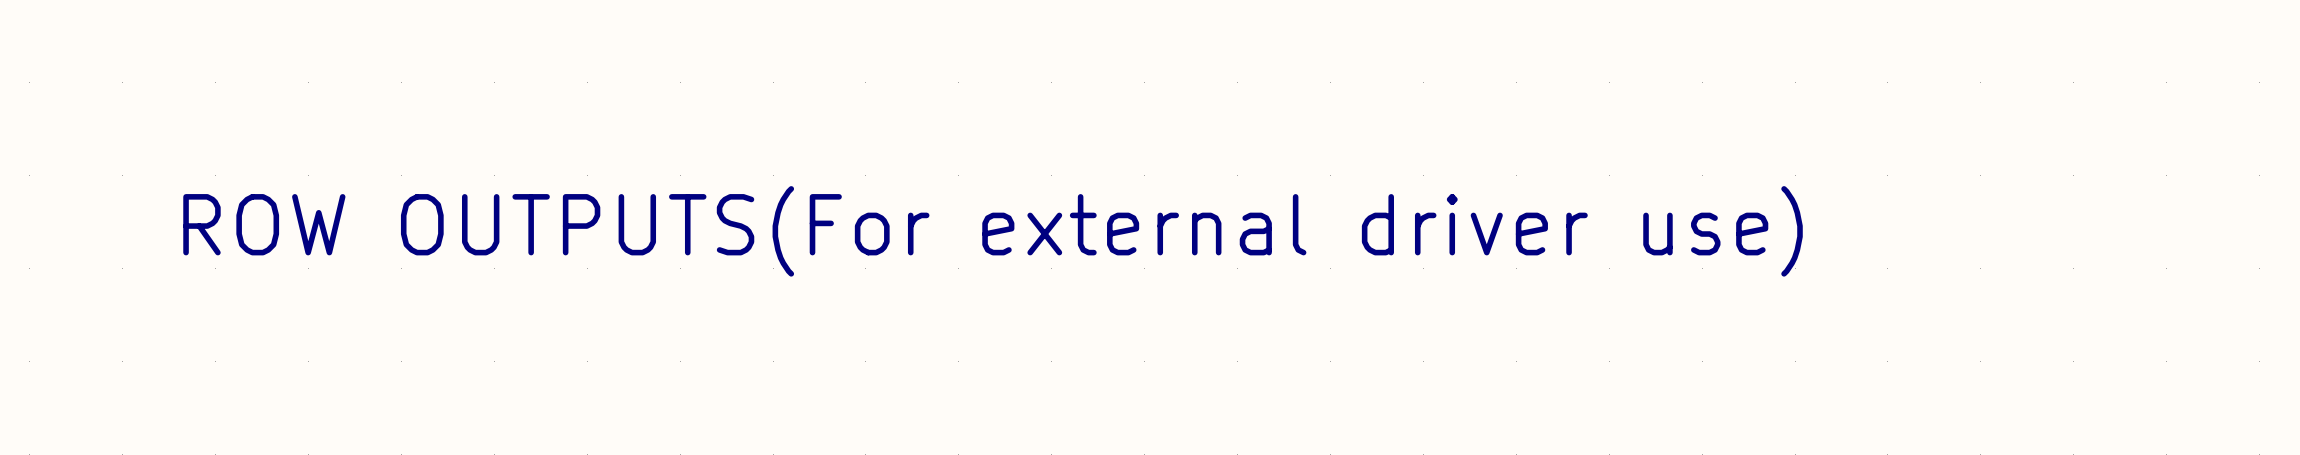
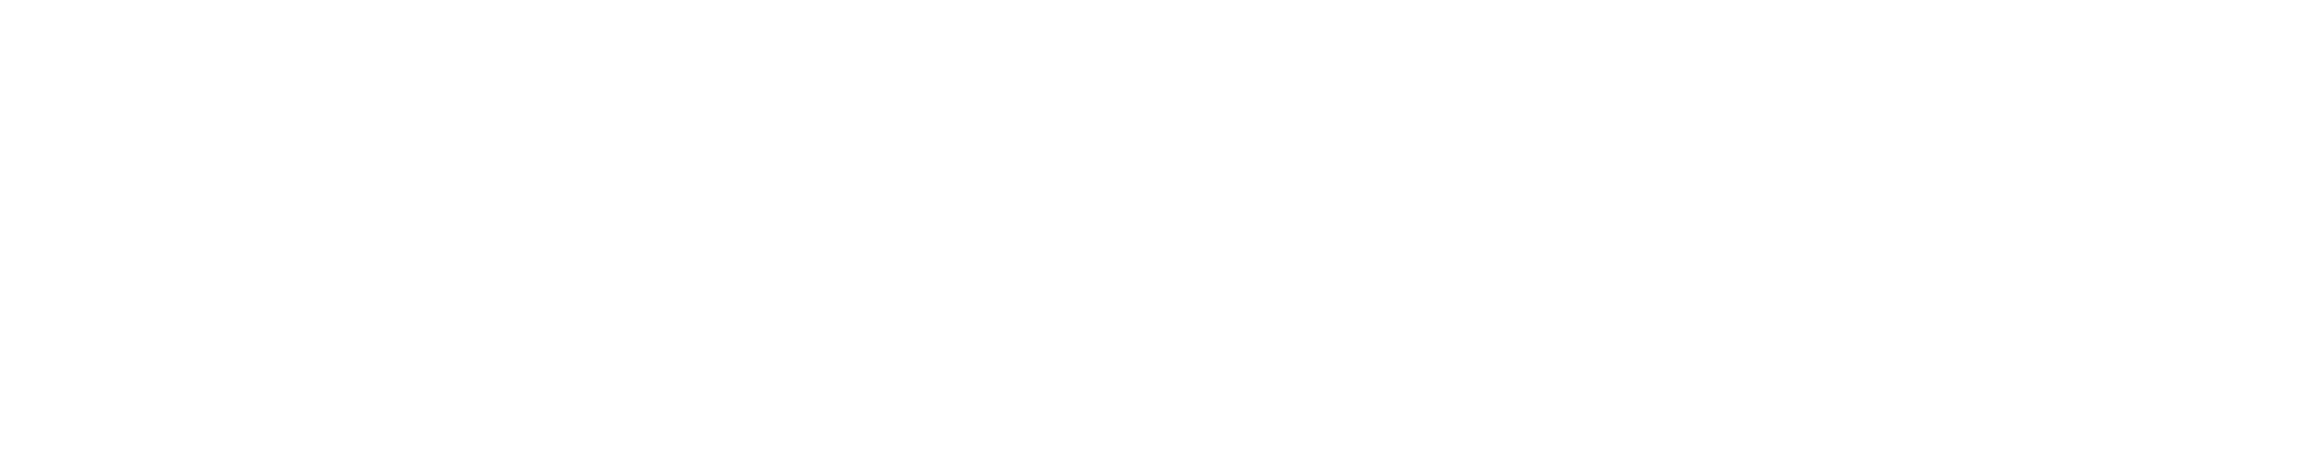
text: ROW OUTPUTS(For external driver use) (993, 231) -> none

